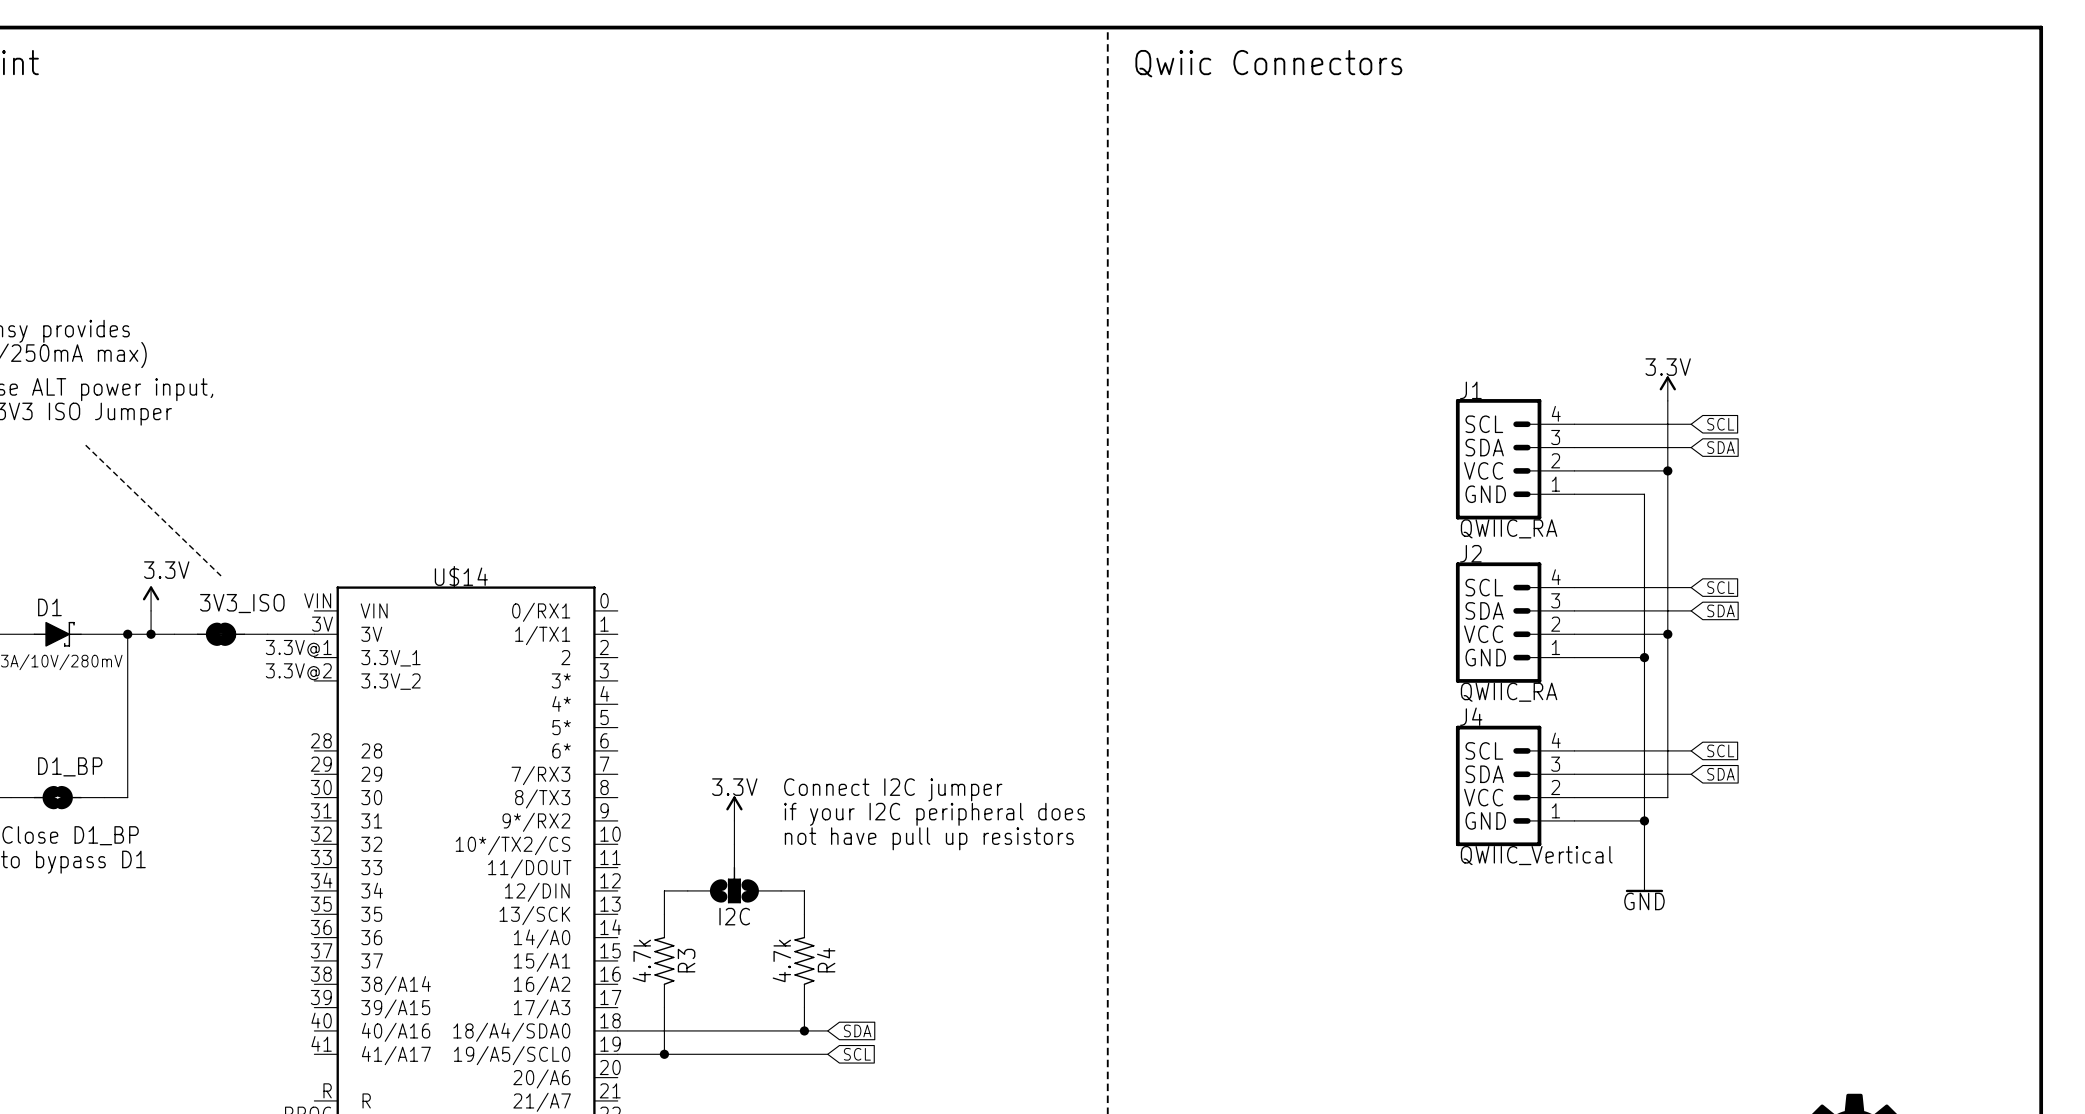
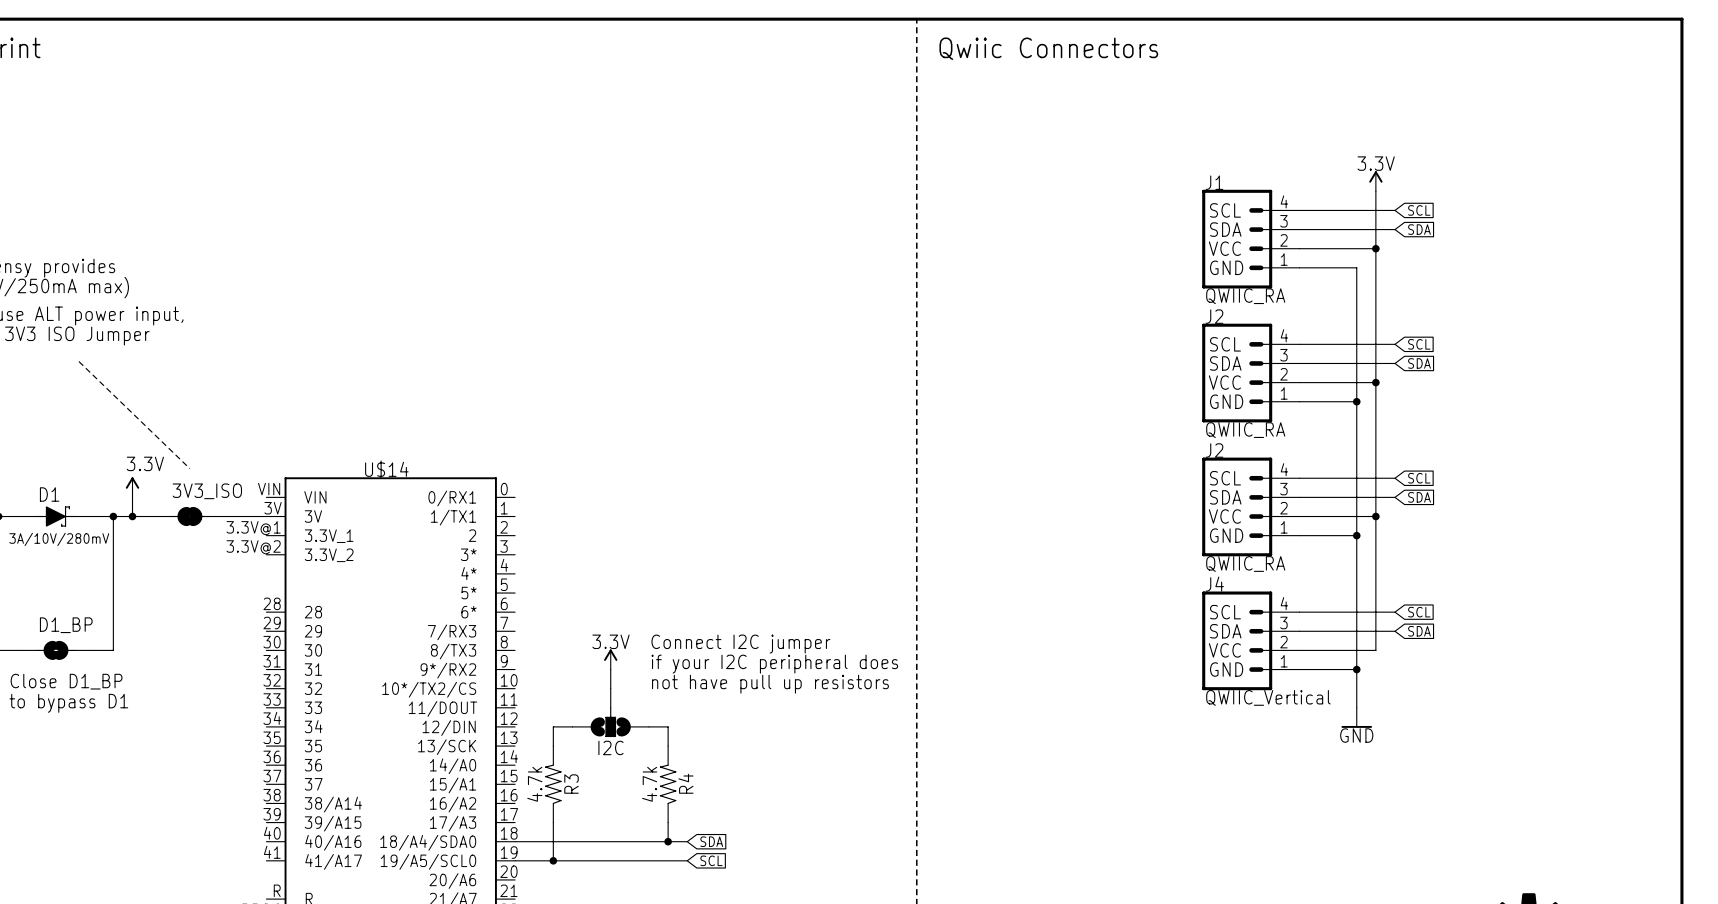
wire: none -> (1375, 191) (1375, 325)
wire: none -> (1299, 210) (1395, 210)
global label: none -> SCL (1419, 210)
wire: none -> (1299, 229) (1395, 229)
global label: none -> SDA (1419, 229)
J1: none -> QWIIC_RA (1250, 239)
wire: none -> (1299, 248) (1375, 248)
junction: none -> (1375, 248)
wire: none -> (1299, 267) (1356, 267) (1356, 401)
power symbol position: 3.3V (1667, 388) -> 3.3V (1375, 181)
J1 name: J1 (1470, 390) -> J2 (1214, 316)
junction: none -> (1356, 401)

